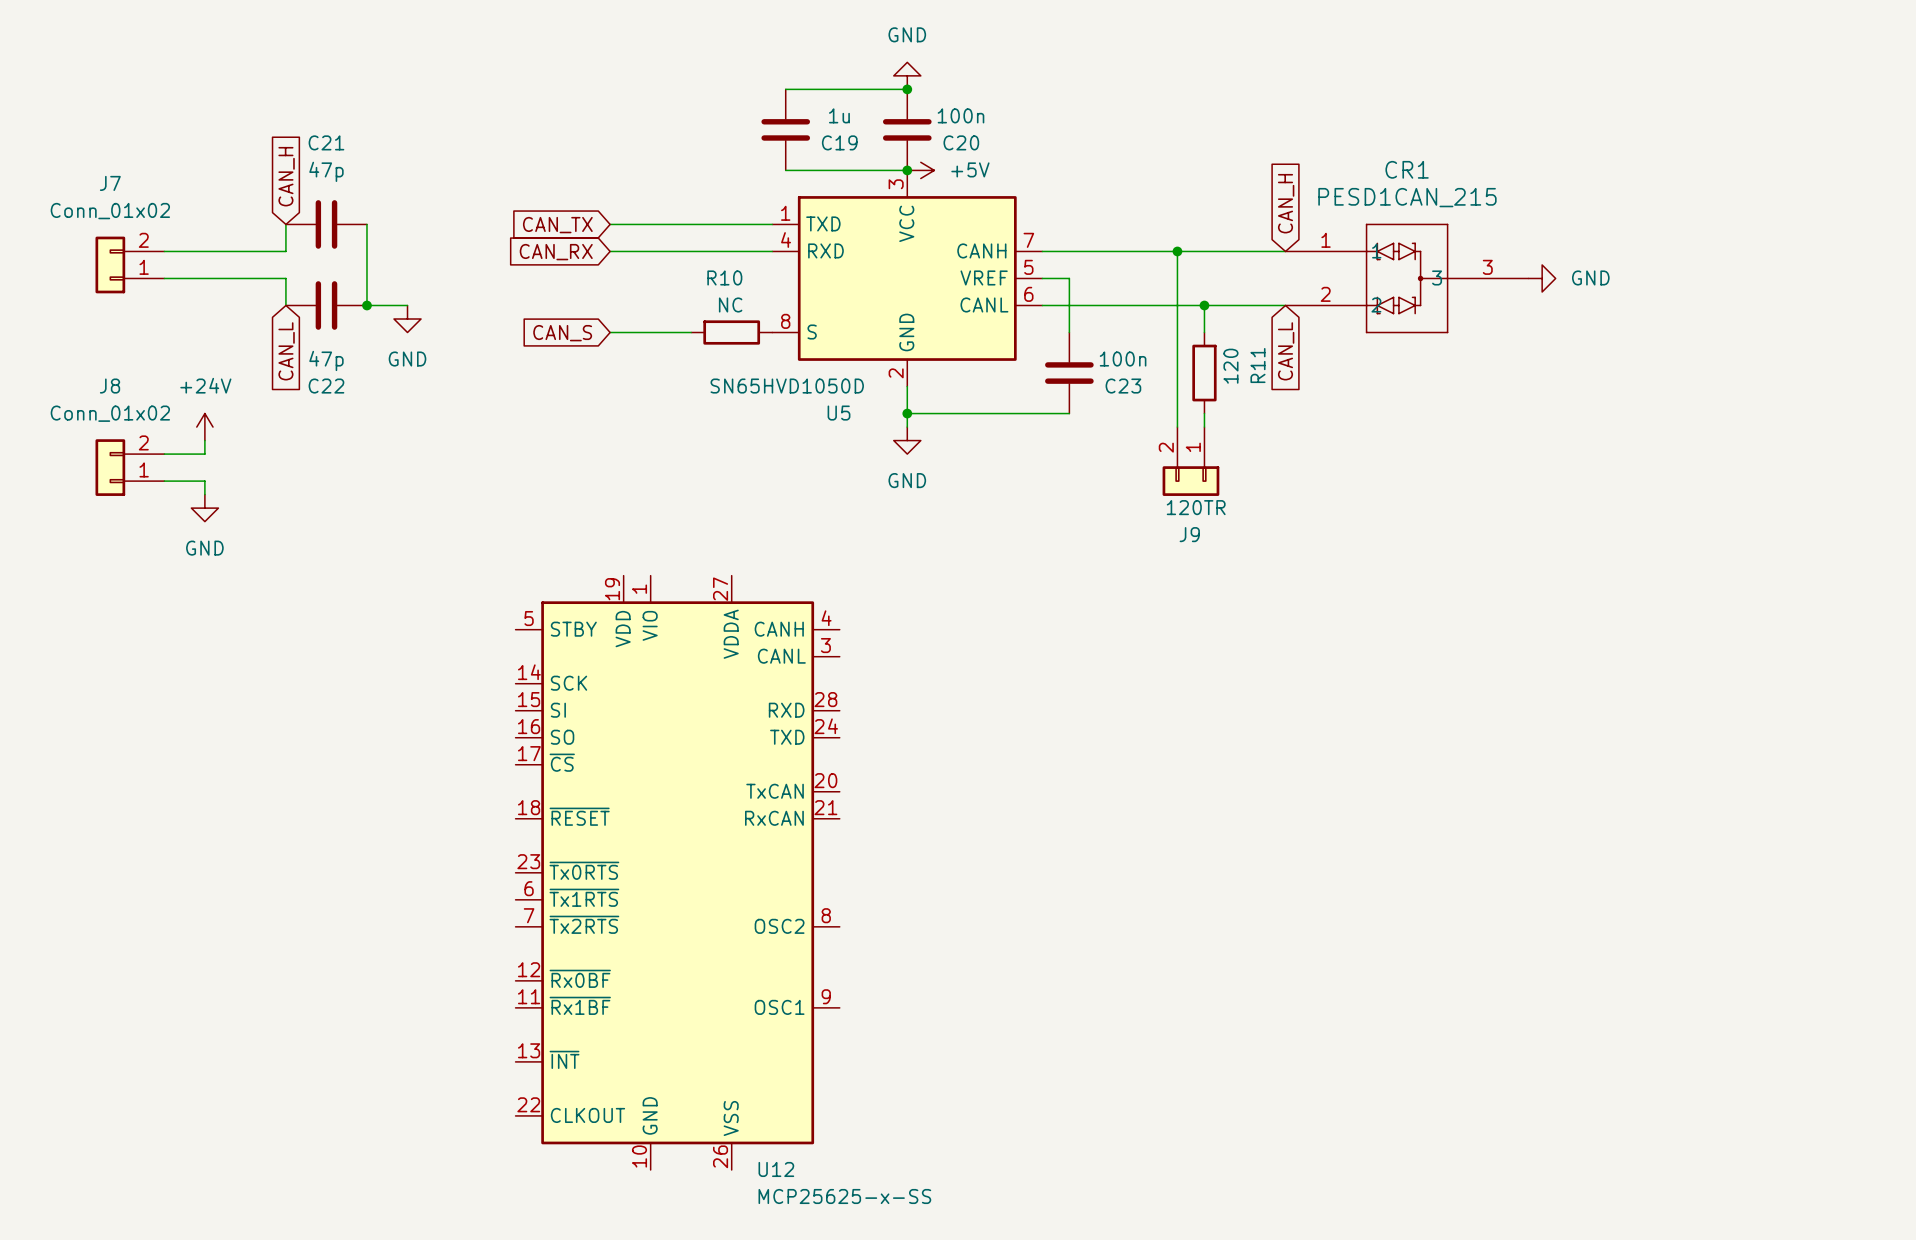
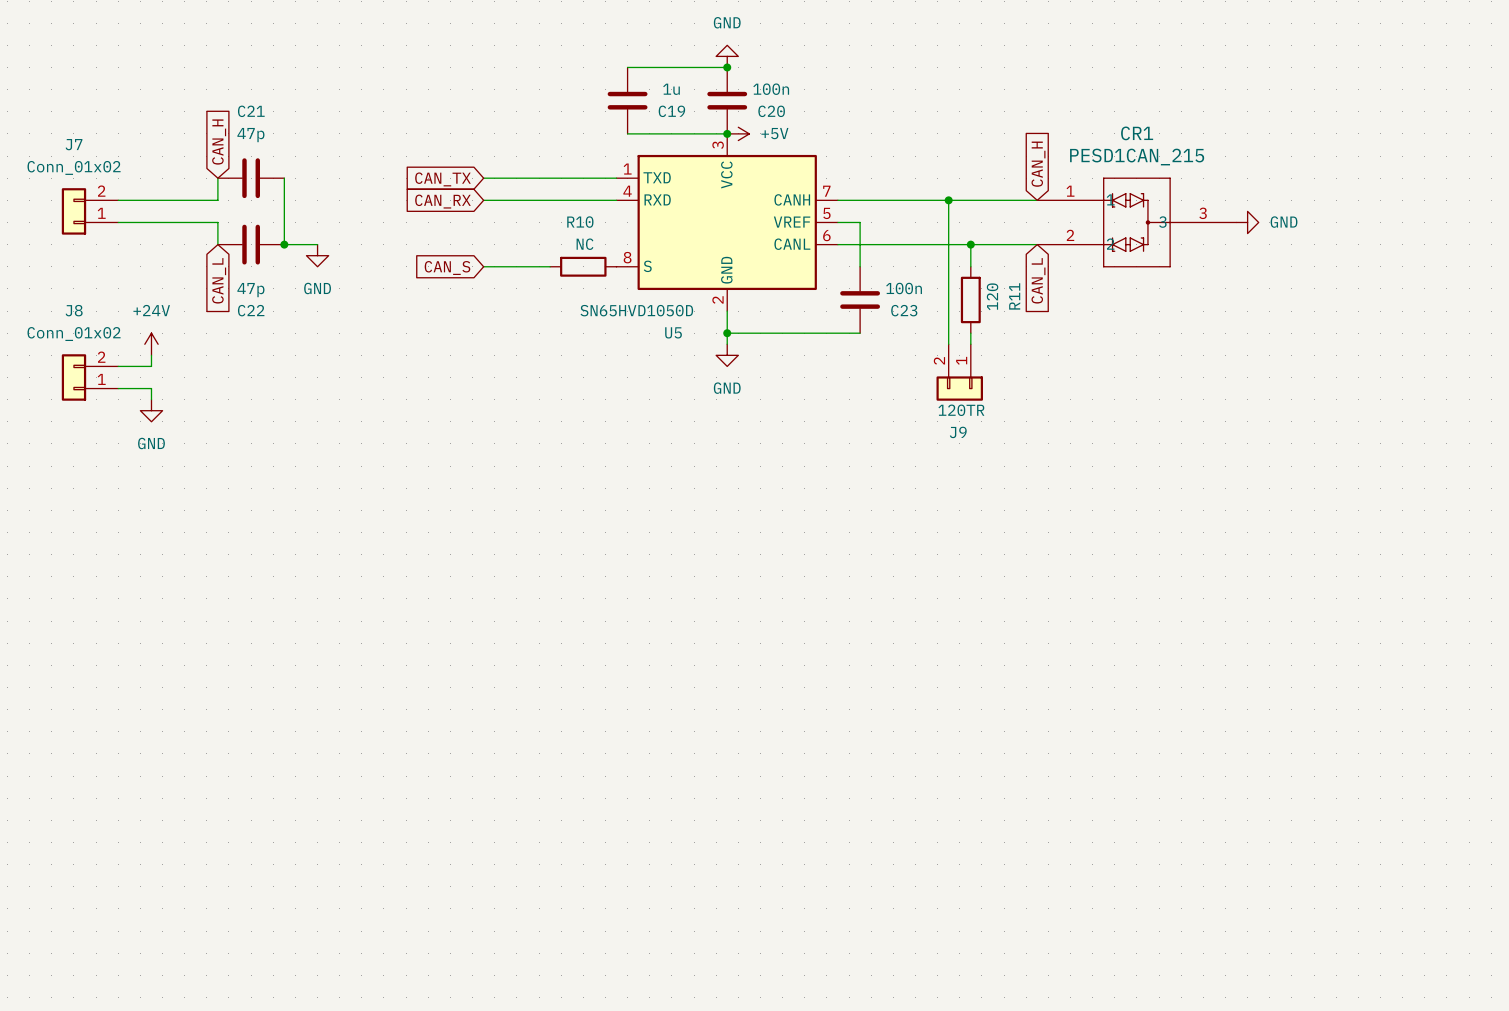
U12: MCP25625-x-SS (677, 872) -> none

